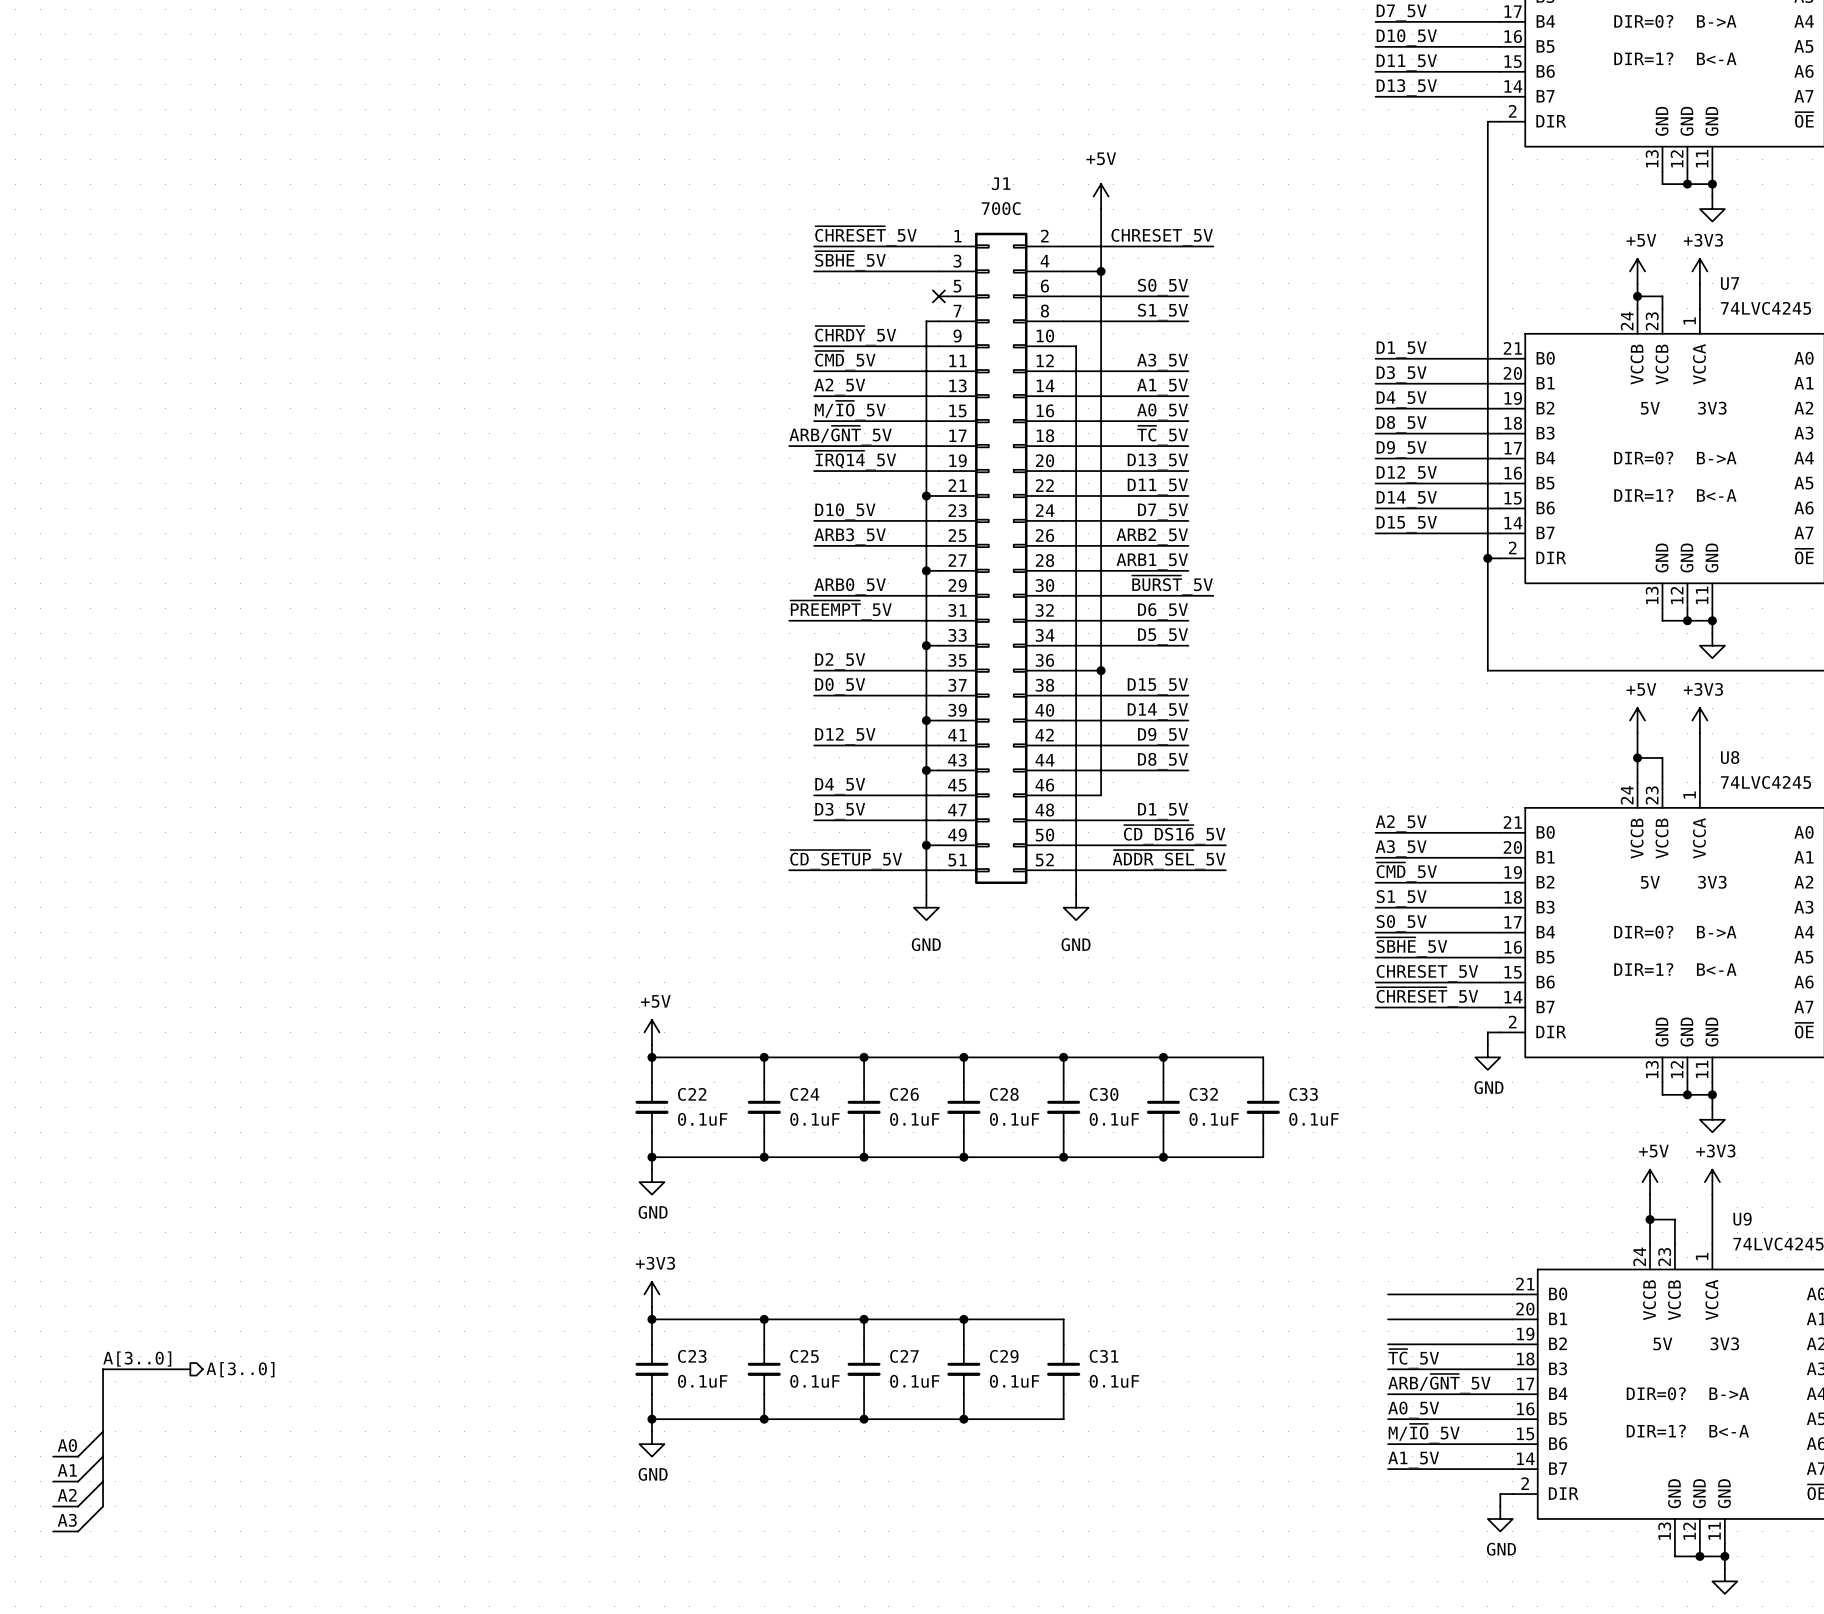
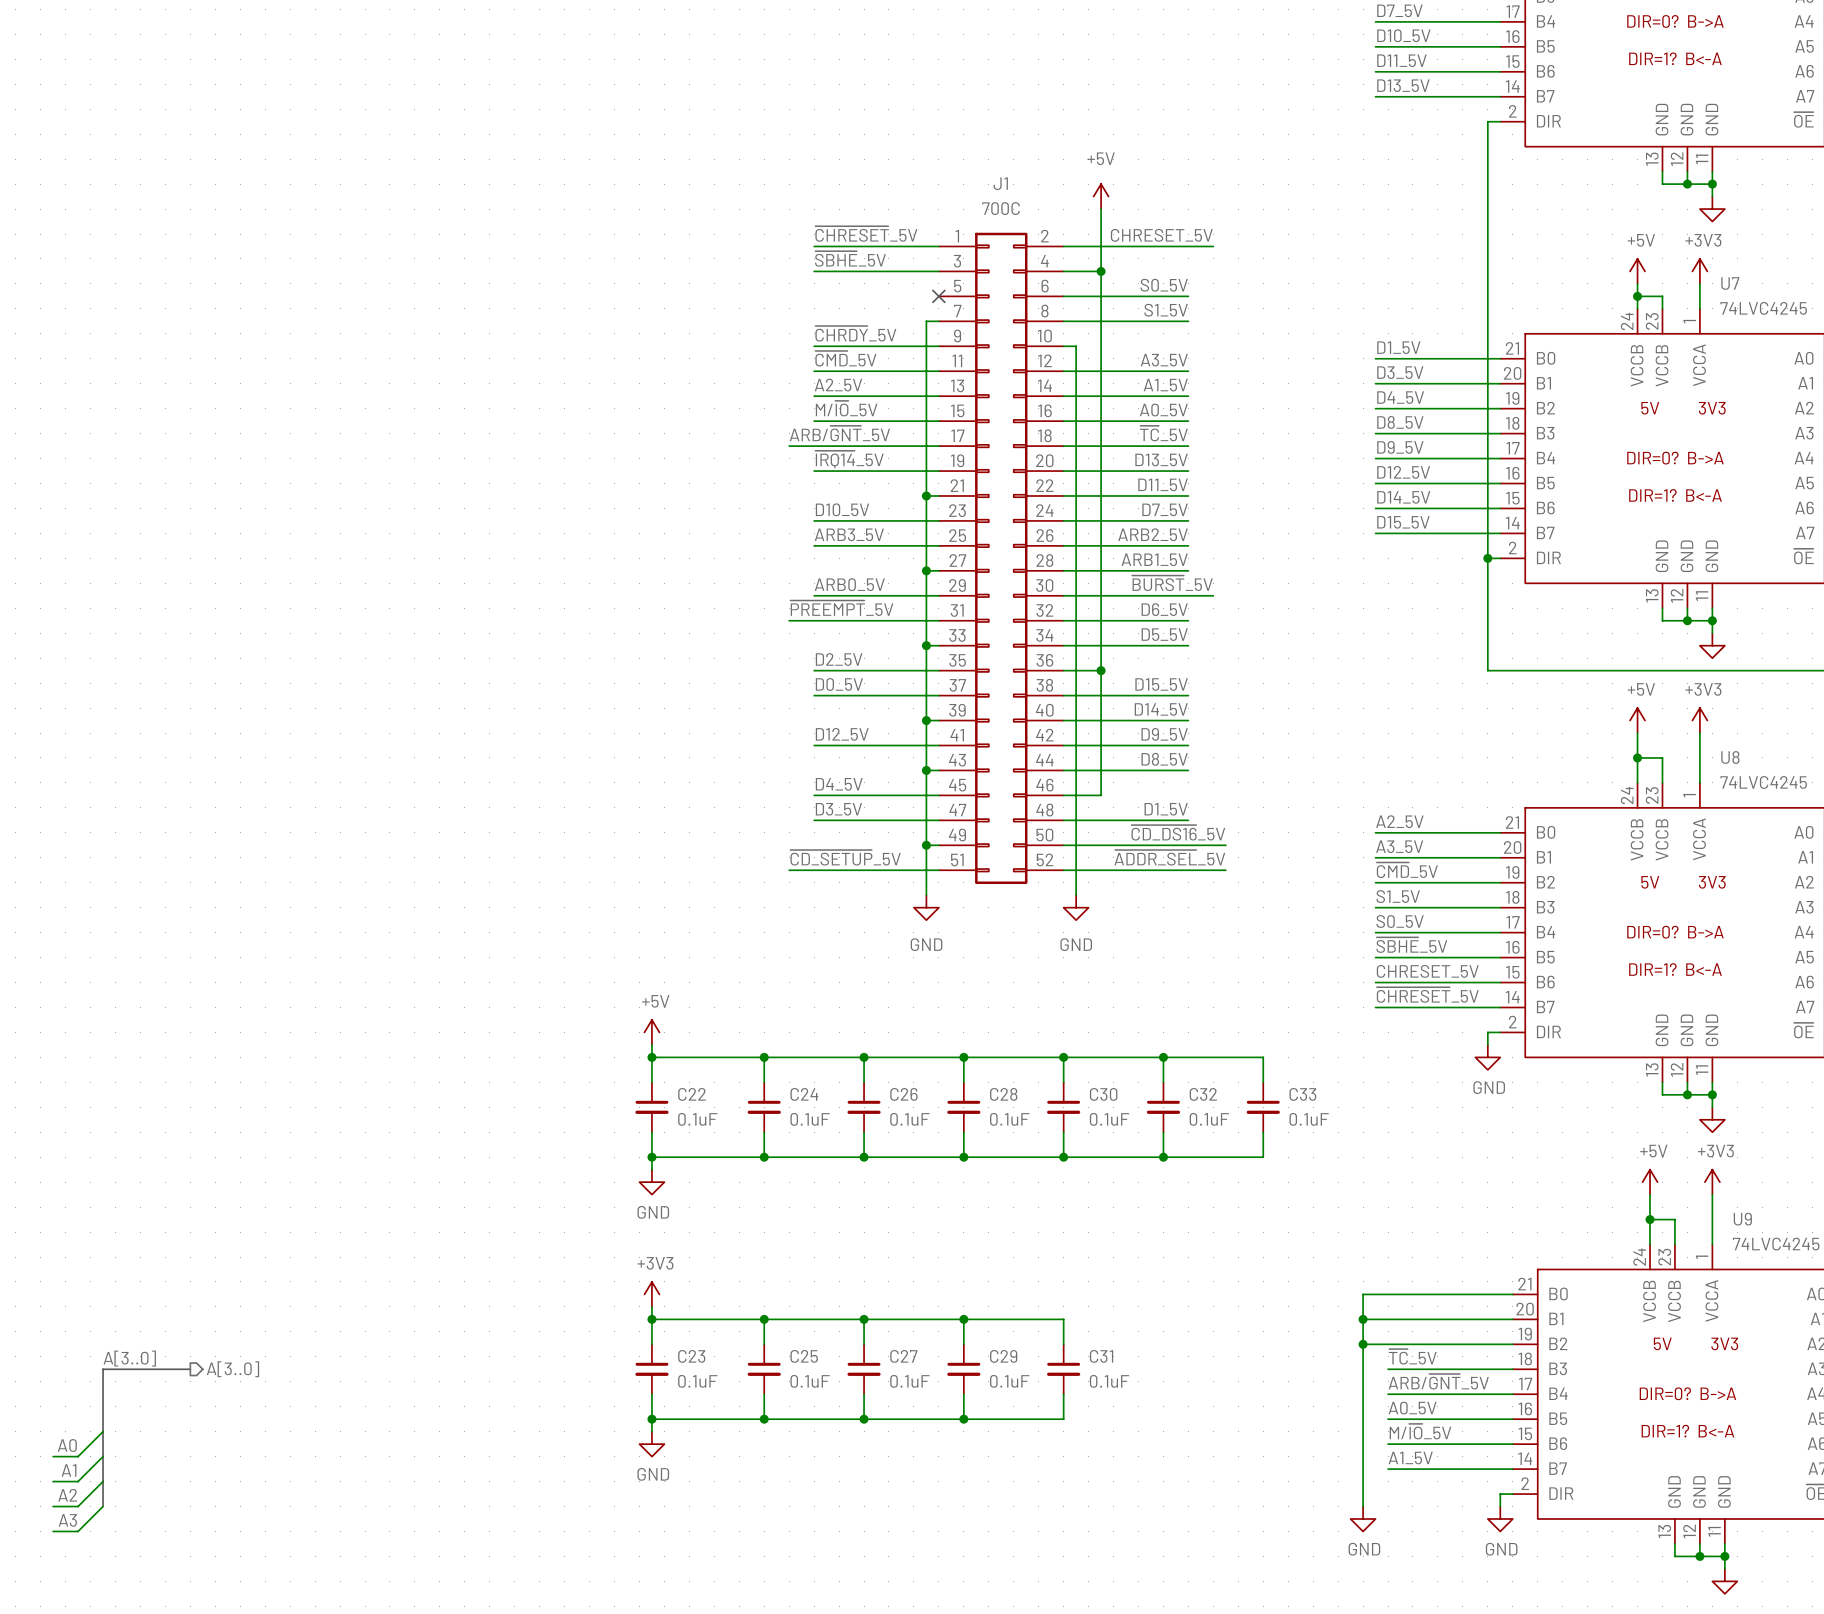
wire: none -> (1388, 1294) (1363, 1294) (1363, 1506)
wire: none -> (1363, 1319) (1388, 1319)
junction: none -> (1363, 1319)
wire: none -> (1363, 1344) (1388, 1344)
junction: none -> (1363, 1344)
power symbol: none -> GND (1363, 1518)

